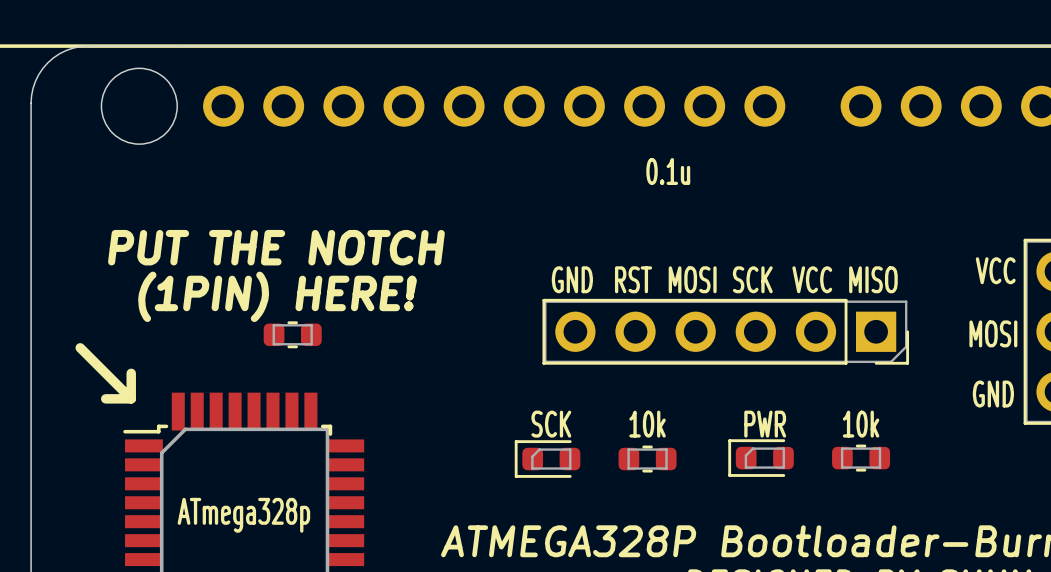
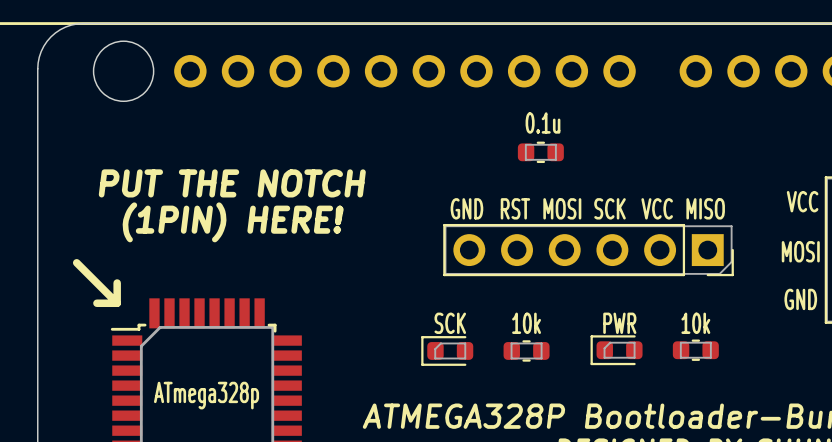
part position: (292, 334) -> (540, 152)

